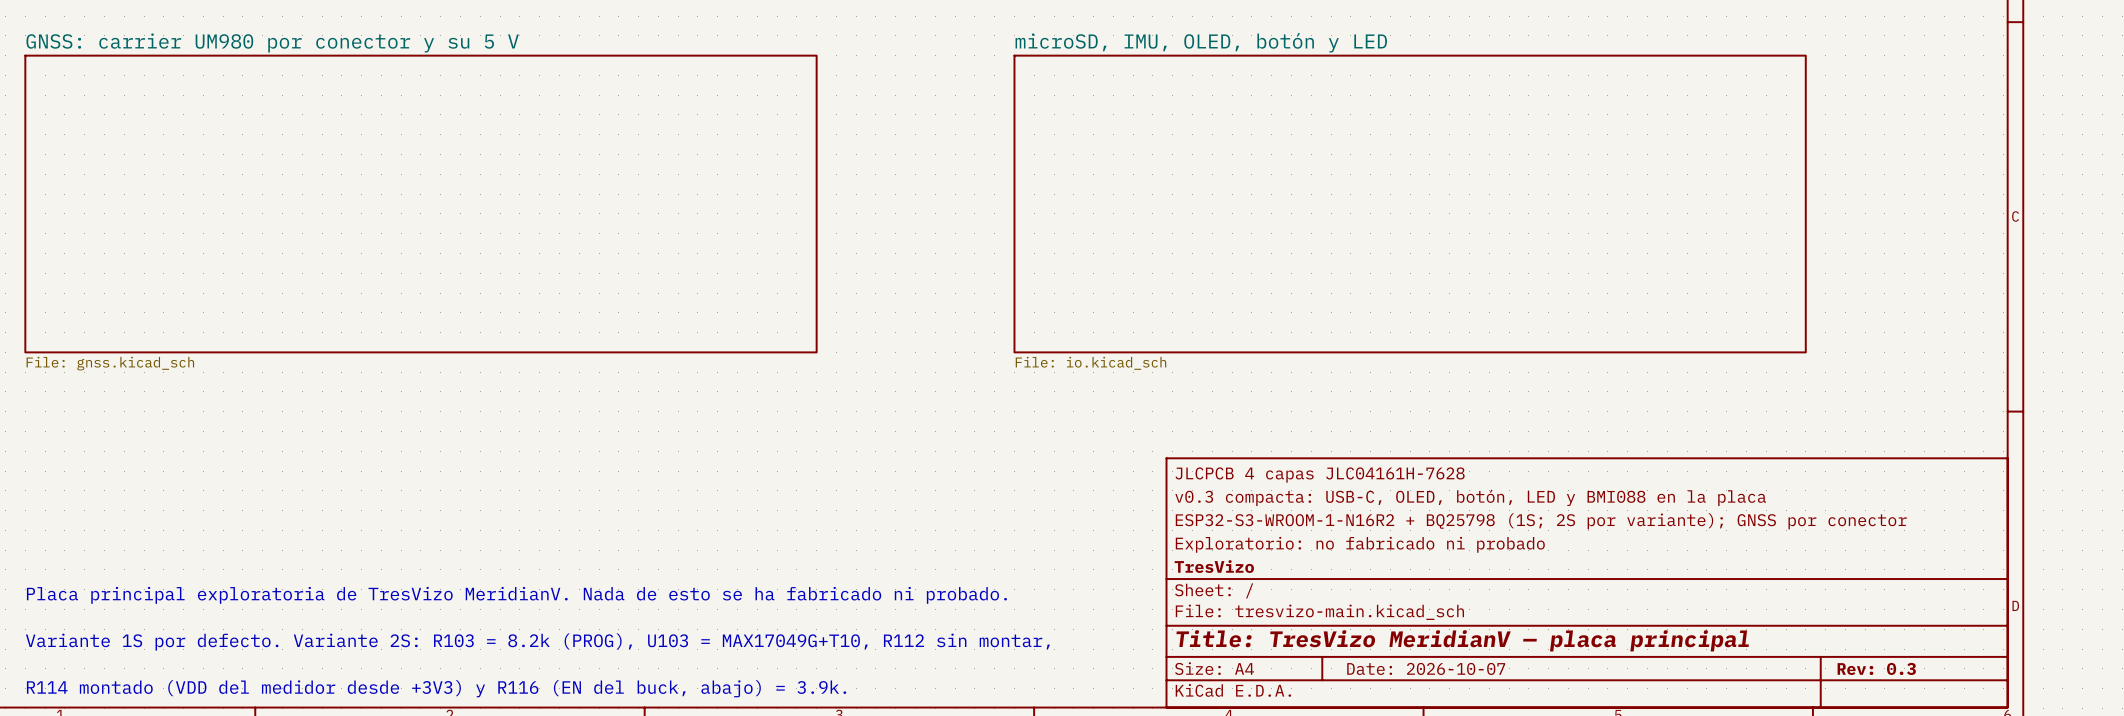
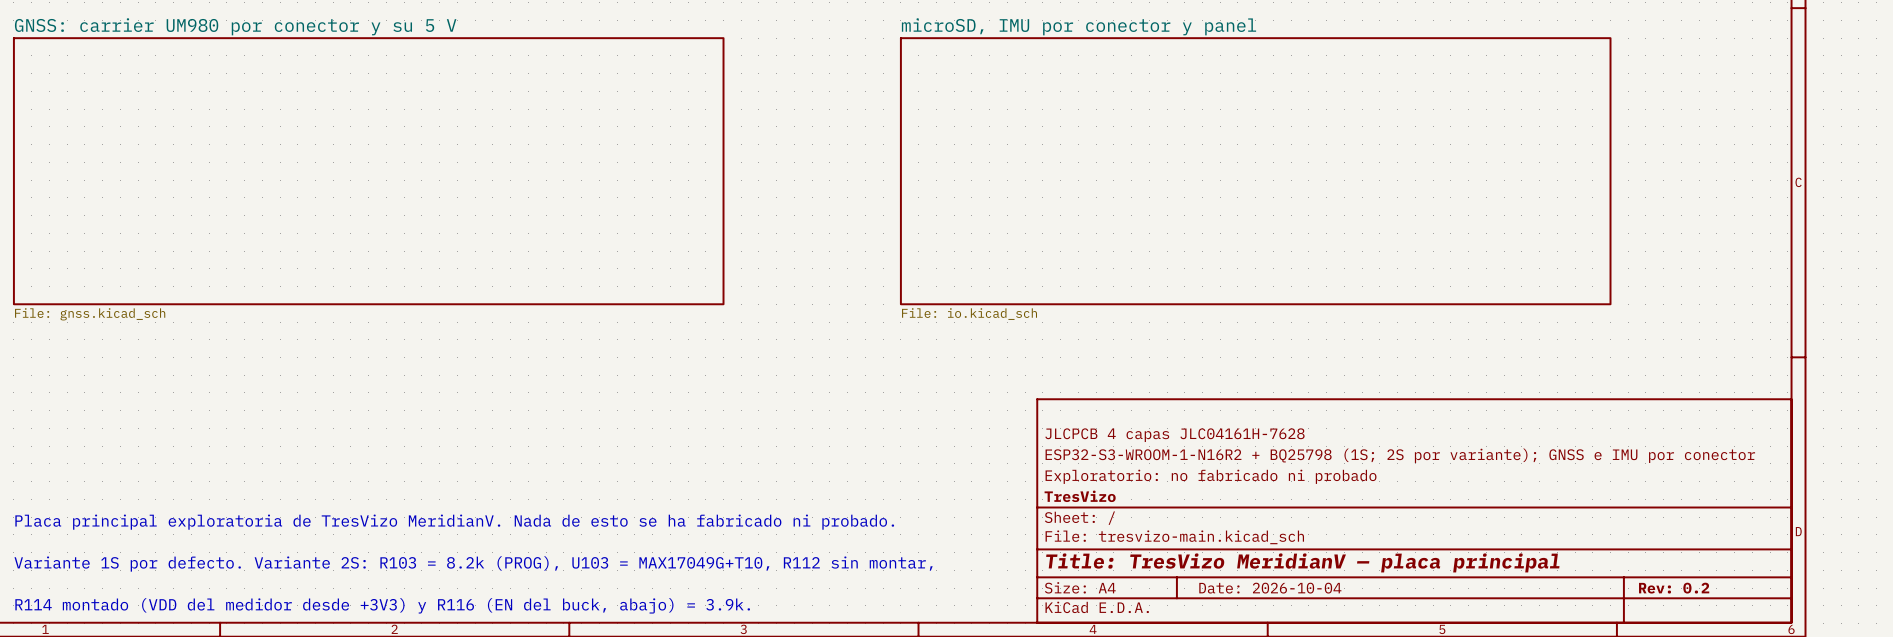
sheet microSD, IMU, OLED, botón y LED name: microSD, IMU, OLED, botón y LED (1201, 42) -> microSD, IMU por conector y panel (1078, 26)
title block: JLCPCB 4 capas JLC04161H-7628 (1320, 475) -> none
title block: v0.3 compacta: USB-C, OLED, botón, LED y BMI088 en la placa (1470, 497) -> JLCPCB 4 capas JLC04161H-7628 (1174, 435)
title block: ESP32-S3-WROOM-1-N16R2 + BQ25798 (1S; 2S por variante); GNSS por conector (1541, 521) -> ESP32-S3-WROOM-1-N16R2 + BQ25798 (1S; 2S por variante); GNSS e IMU por conector (1400, 455)
title block: Date: 2026-10-07 (1426, 668) -> Date: 2026-10-04 (1270, 588)
title block: Rev: 0.3 (1876, 668) -> Rev: 0.2 (1674, 588)

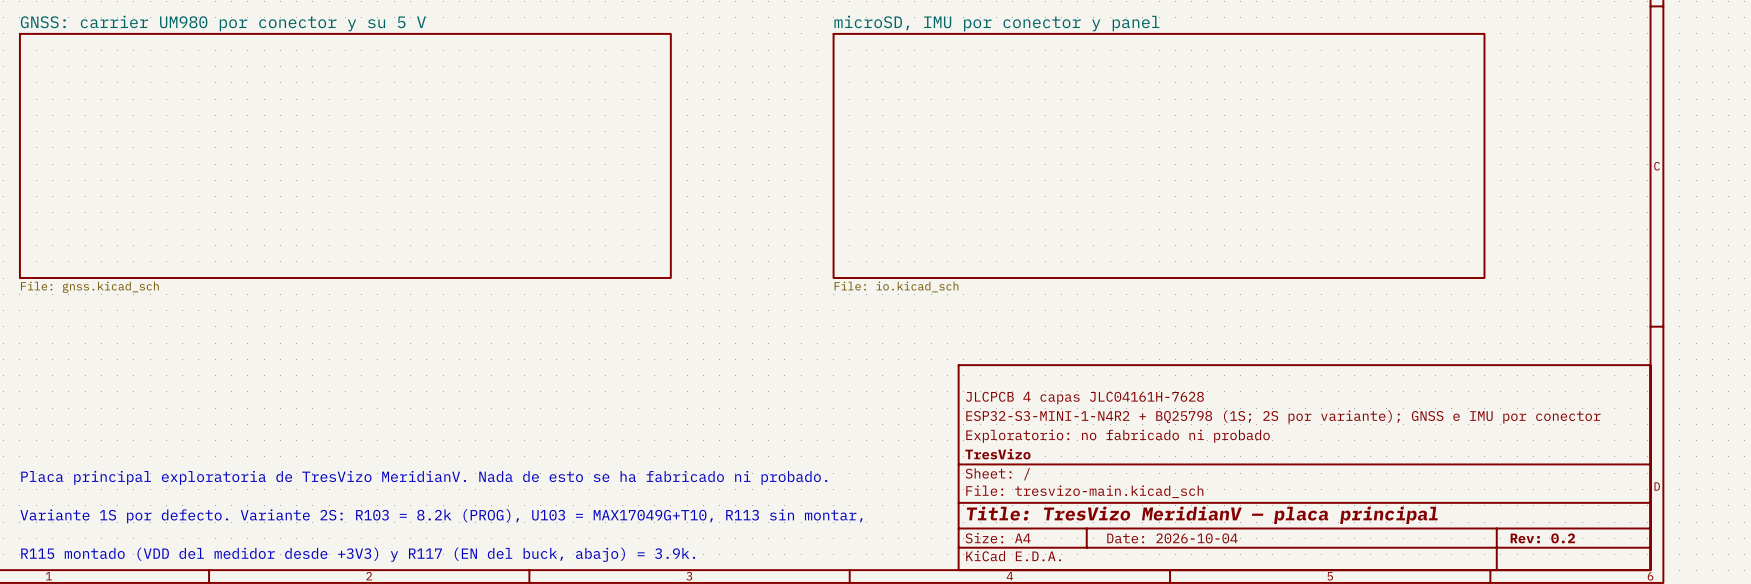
title block: ESP32-S3-WROOM-1-N16R2 + BQ25798 (1S; 2S por variante); GNSS e IMU por conector (1400, 455) -> ESP32-S3-MINI-1-N4R2 + BQ25798 (1S; 2S por variante); GNSS e IMU por conector (1283, 416)
text: Variante 1S por defecto. Variante 2S: R103 = 8.2k (PROG), U103 = MAX17049G+T10, R112 sin montar, (473, 563) -> Variante 1S por defecto. Variante 2S: R103 = 8.2k (PROG), U103 = MAX17049G+T10, R113 sin montar, (441, 516)
text: R114 montado (VDD del medidor desde +3V3) y R116 (EN del buck, abajo) = 3.9k. (382, 605) -> R115 montado (VDD del medidor desde +3V3) y R117 (EN del buck, abajo) = 3.9k. (358, 554)

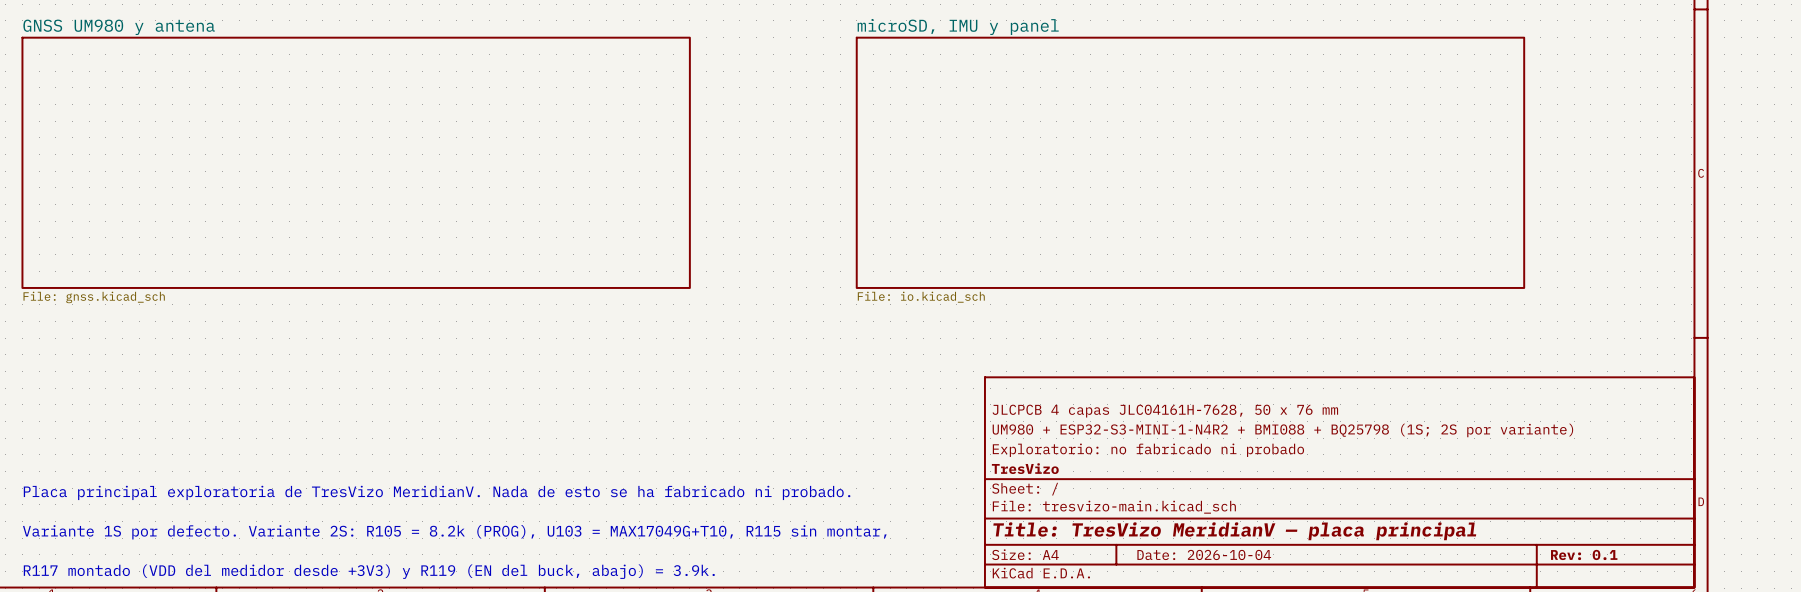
sheet GNSS UM980 y antena name: GNSS: carrier UM980 por conector y su 5 V (223, 23) -> GNSS UM980 y antena (119, 27)
sheet microSD, IMU por conector y panel name: microSD, IMU por conector y panel (996, 23) -> microSD, IMU y panel (958, 26)
title block: JLCPCB 4 capas JLC04161H-7628 (1084, 398) -> JLCPCB 4 capas JLC04161H-7628, 50 x 76 mm (1165, 411)
title block: ESP32-S3-MINI-1-N4R2 + BQ25798 (1S; 2S por variante); GNSS e IMU por conector (1283, 416) -> UM980 + ESP32-S3-MINI-1-N4R2 + BMI088 + BQ25798 (1S; 2S por variante) (1282, 430)
text: Variante 1S por defecto. Variante 2S: R103 = 8.2k (PROG), U103 = MAX17049G+T10, R113 sin montar, (441, 516) -> Variante 1S por defecto. Variante 2S: R105 = 8.2k (PROG), U103 = MAX17049G+T10, R115 sin montar, (454, 532)
title block: Rev: 0.2 (1542, 538) -> Rev: 0.1 (1584, 554)
text: R115 montado (VDD del medidor desde +3V3) y R117 (EN del buck, abajo) = 3.9k. (358, 554) -> R117 montado (VDD del medidor desde +3V3) y R119 (EN del buck, abajo) = 3.9k. (369, 571)

